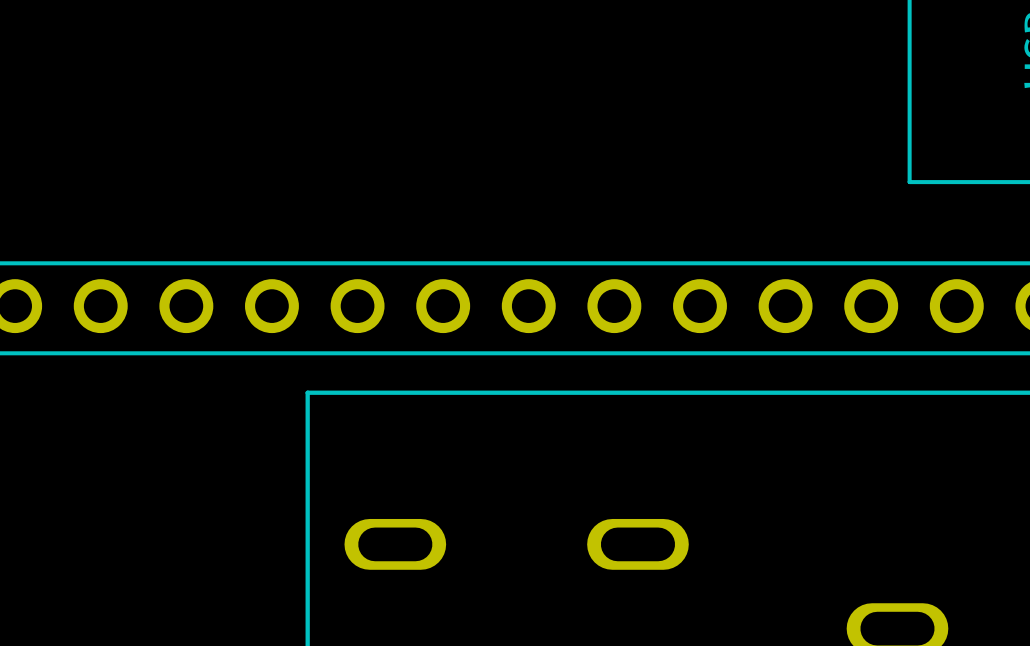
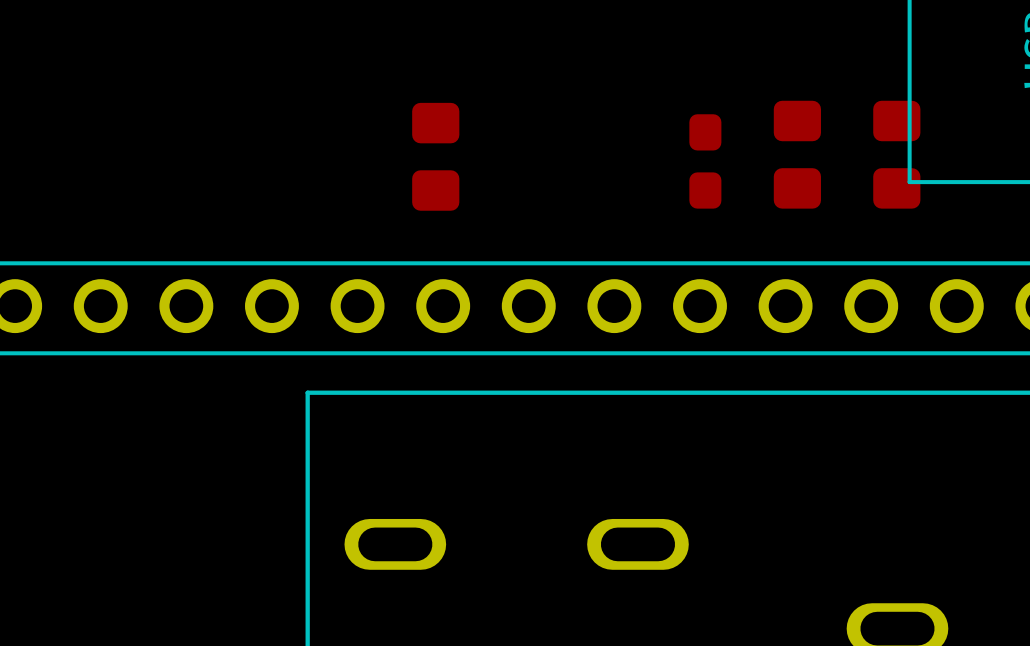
part: none -> (797, 154)
part: none -> (896, 154)
part: none -> (435, 156)
part: none -> (705, 161)

